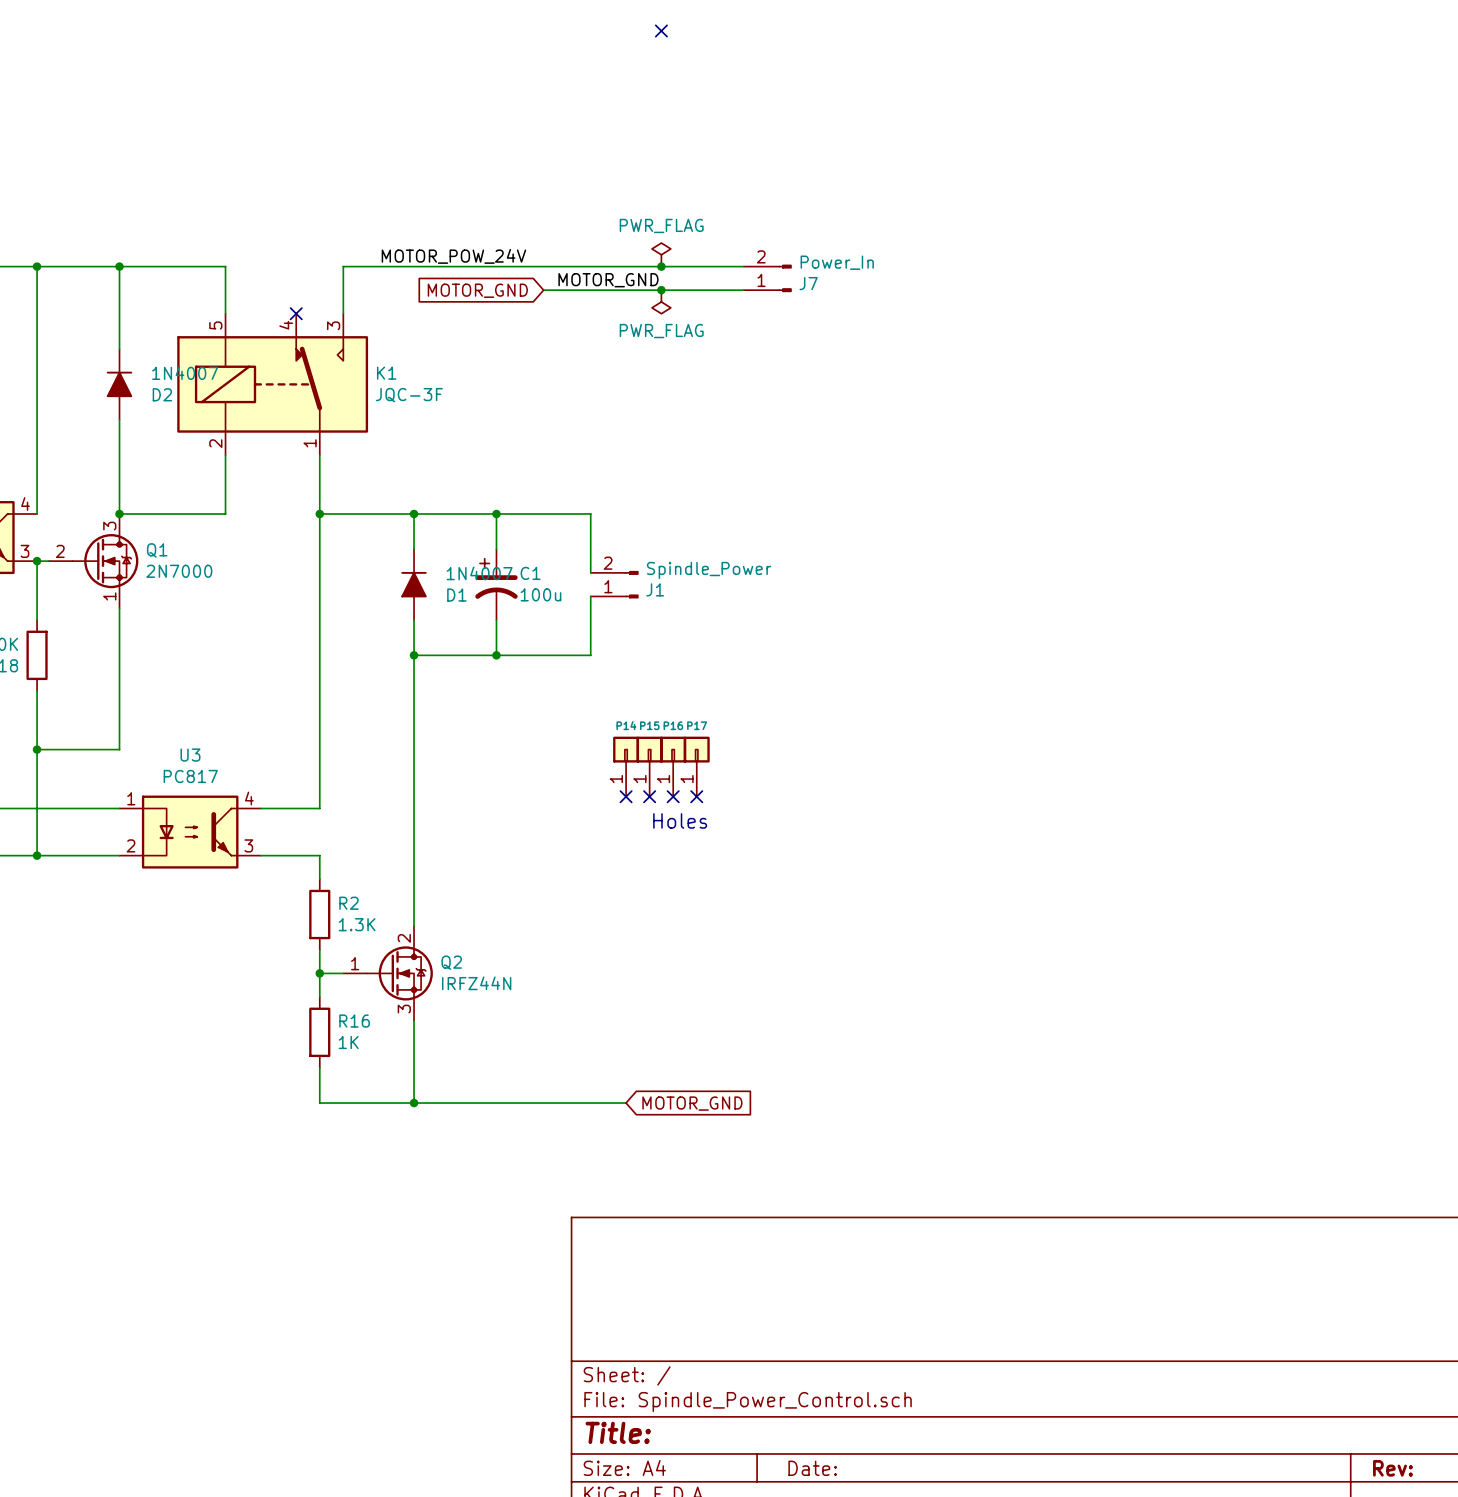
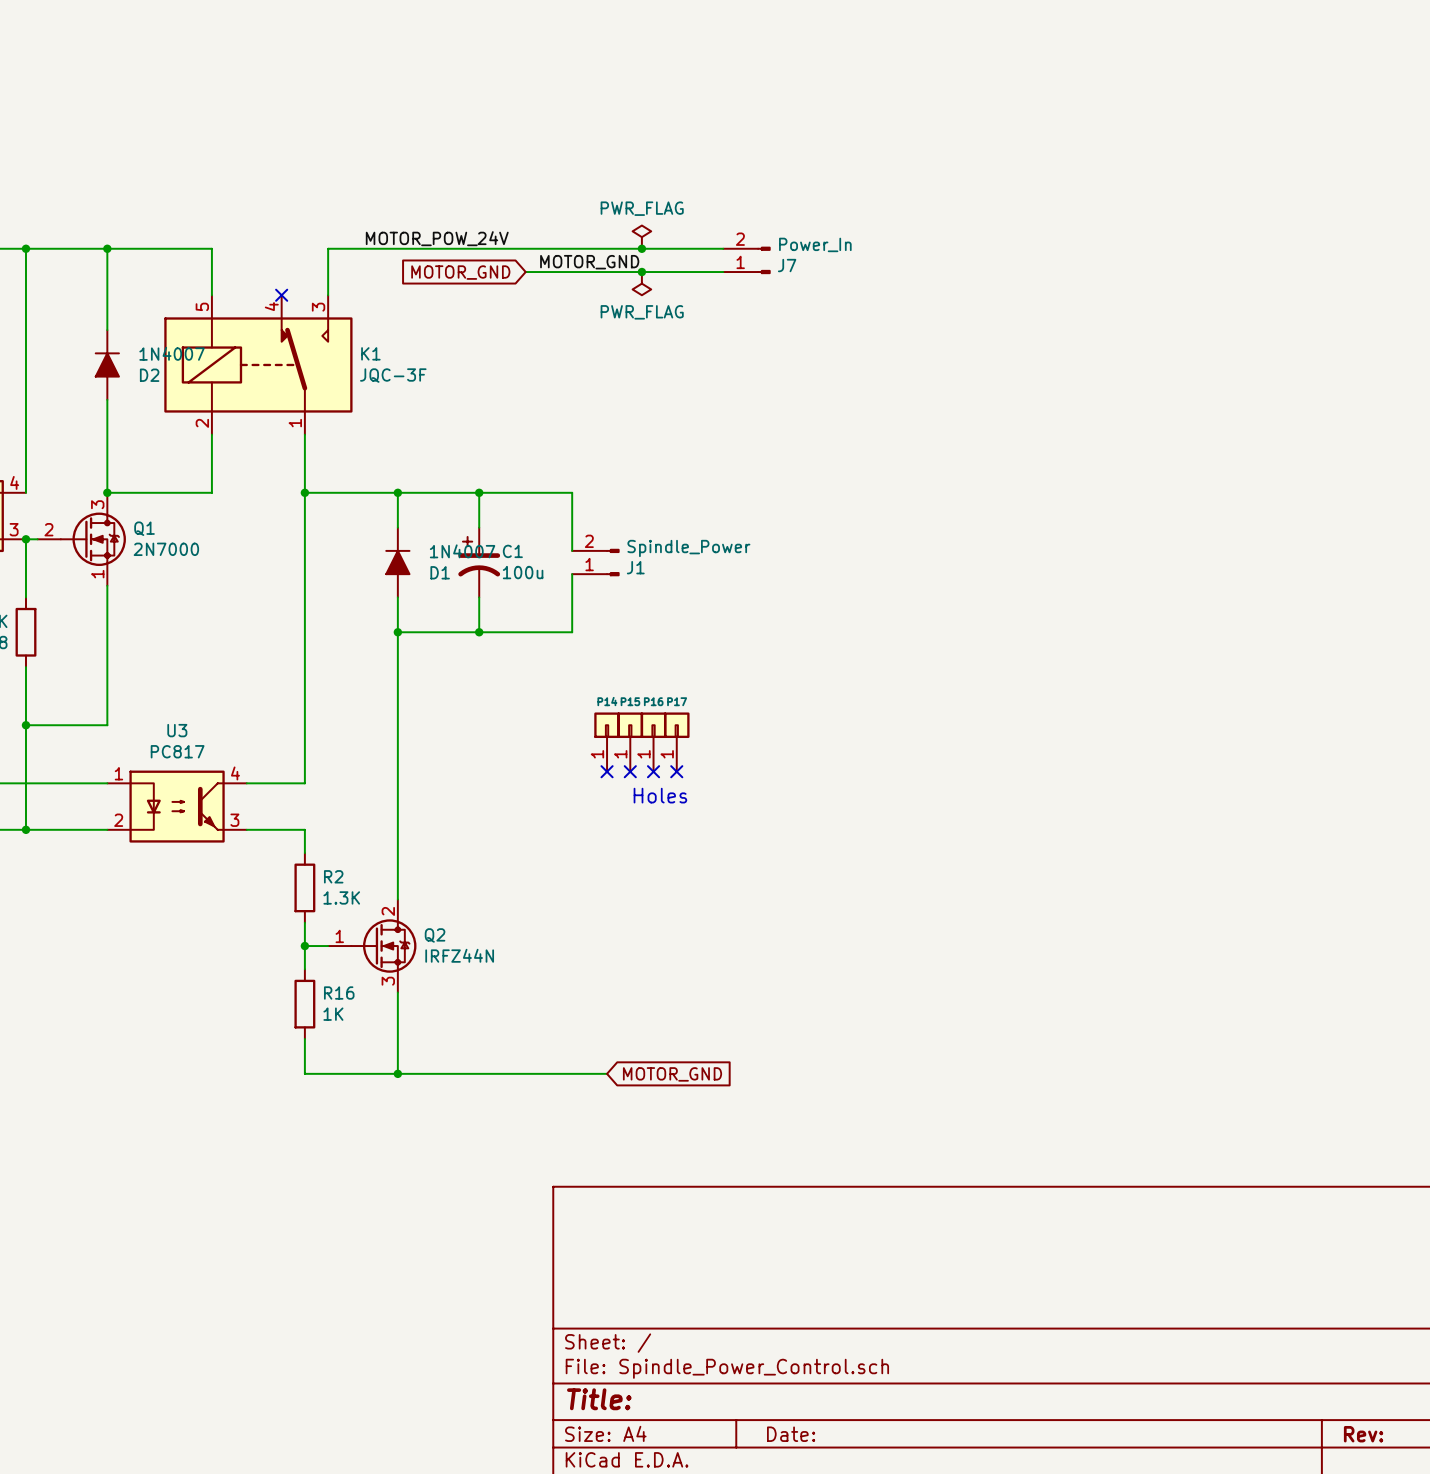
no-connect mark: (661, 30) -> none

